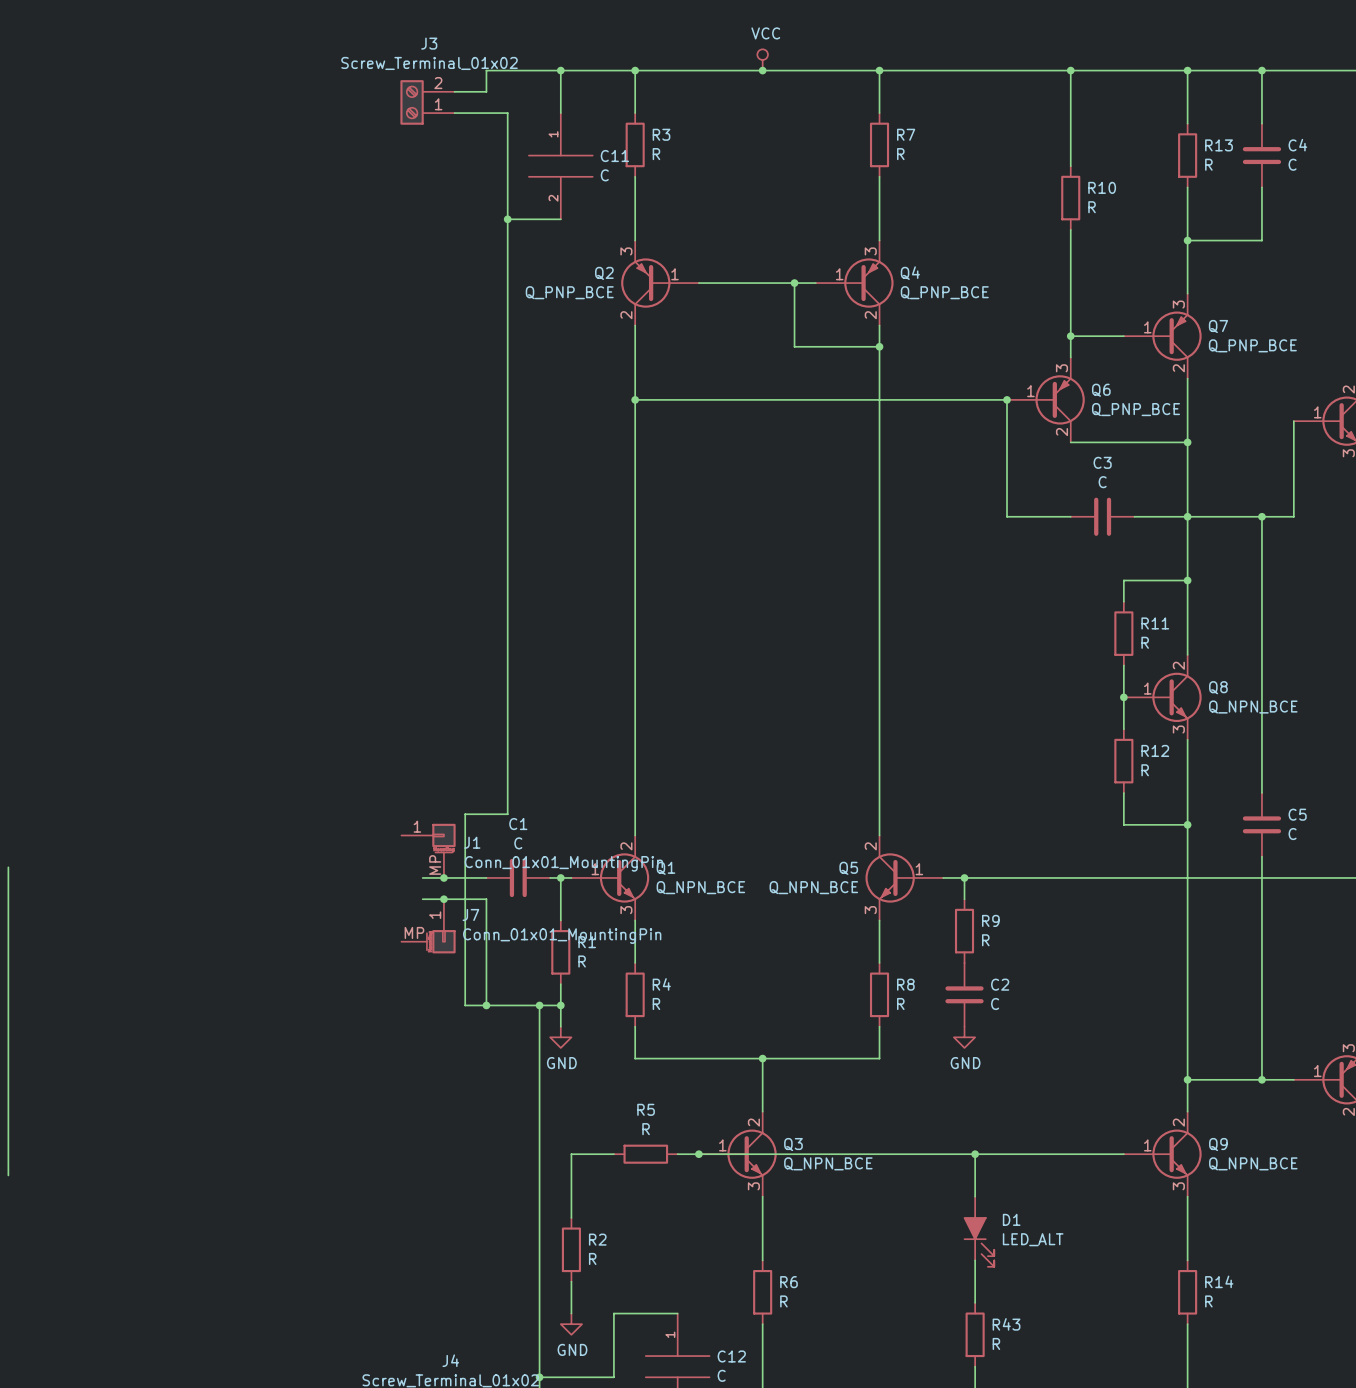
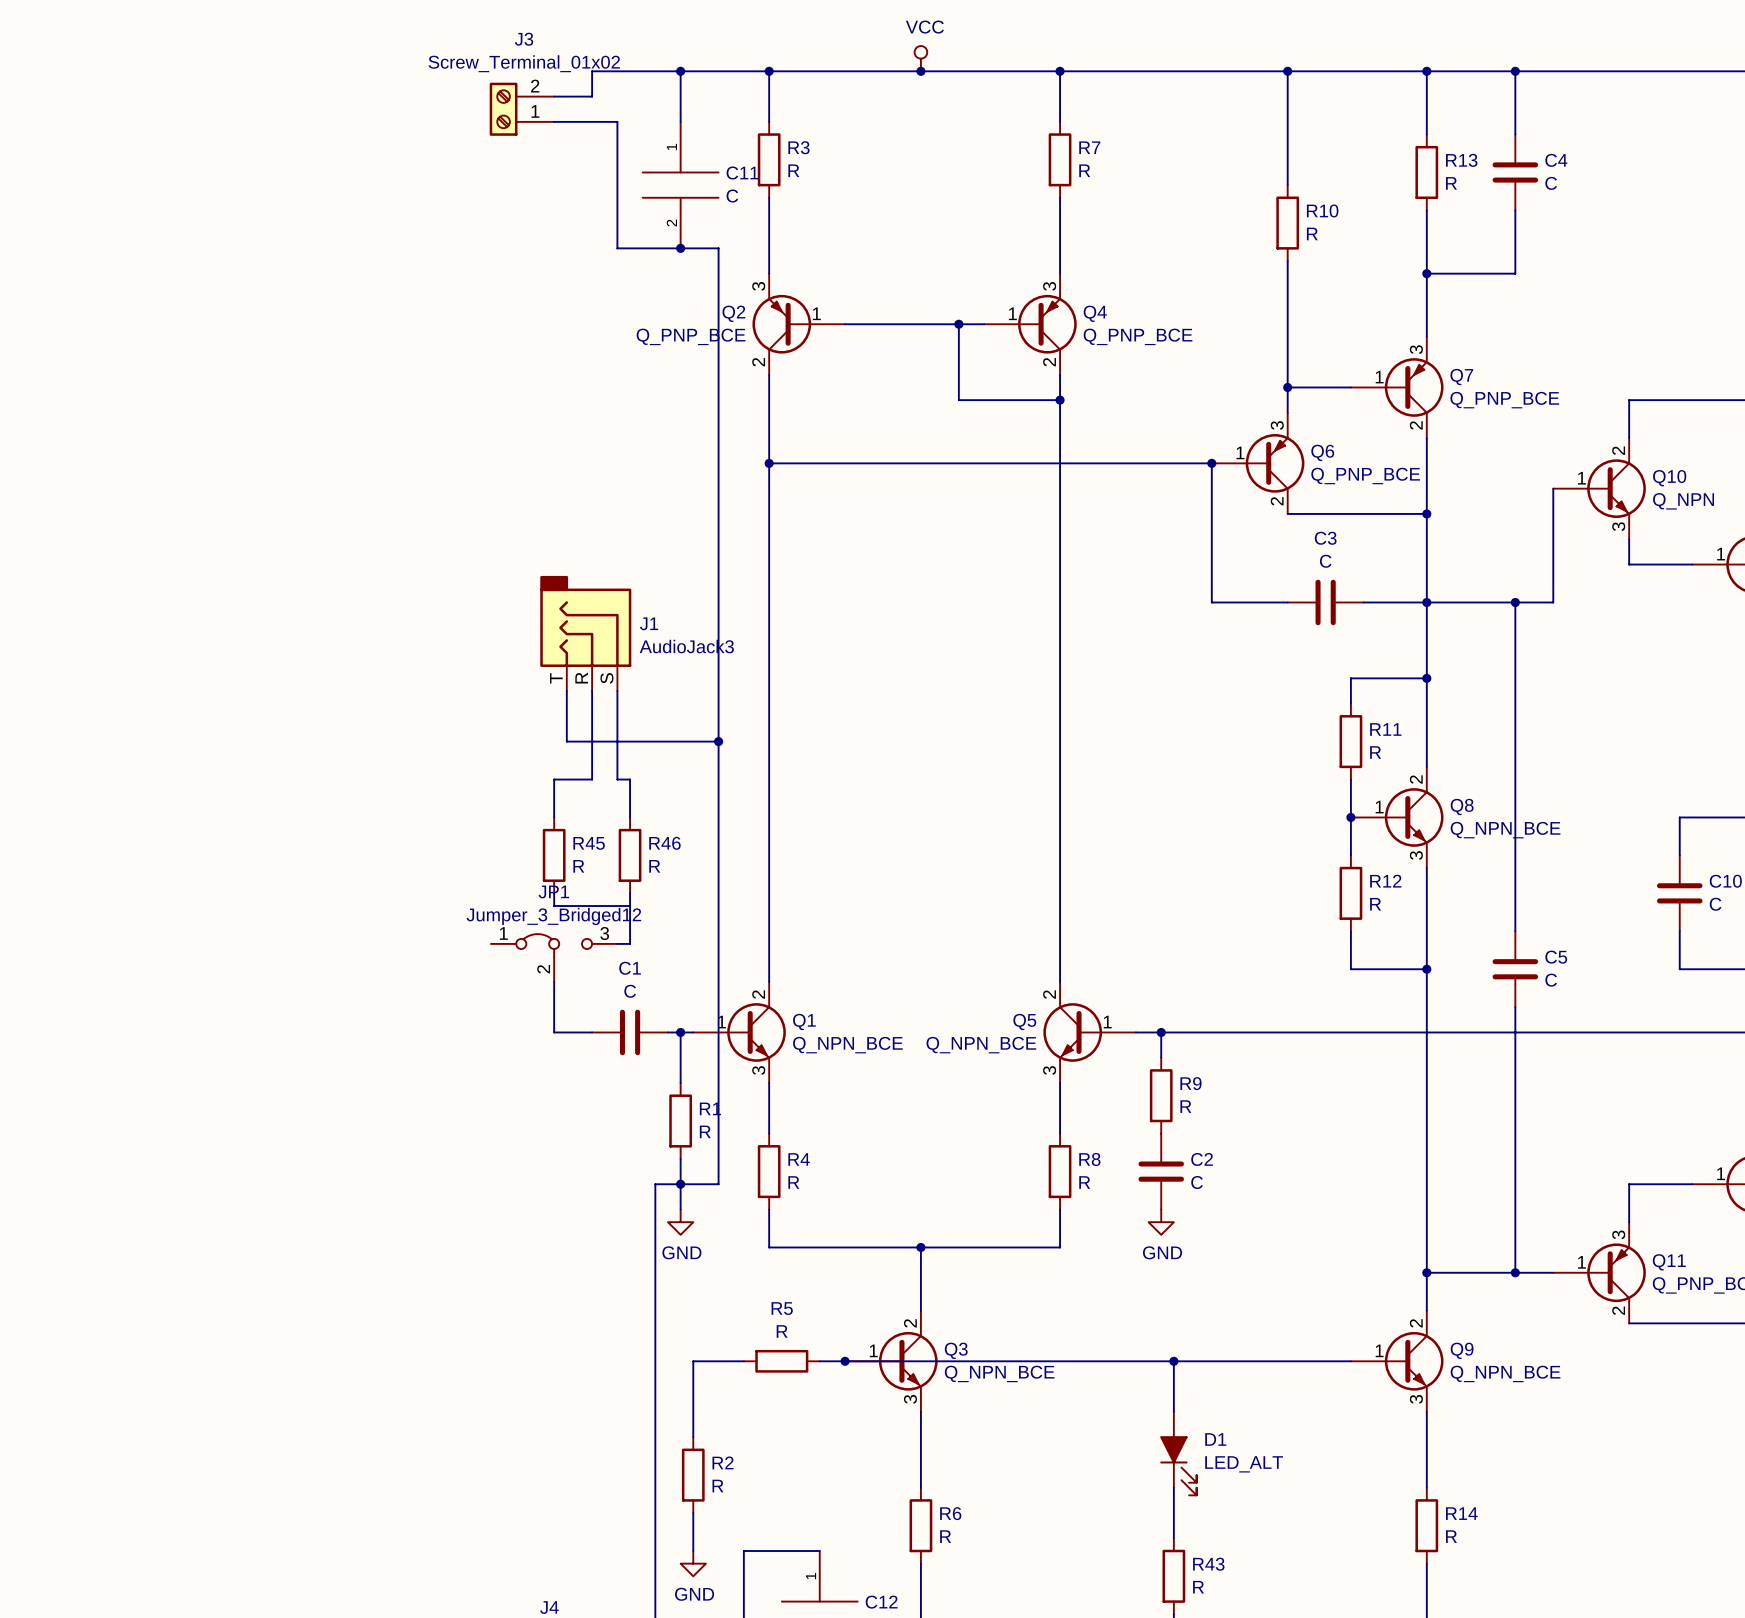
wire: (507, 219) (507, 591) -> none
junction: (507, 219) -> none
wire: none -> (680, 248) (718, 248) (718, 1184) (680, 1184)
junction: none -> (680, 248)
wire: none -> (566, 691) (566, 741) (718, 741)
wire: none -> (592, 691) (592, 779) (554, 779) (554, 817)
junction: none -> (718, 741)
wire: (507, 665) (507, 814) (465, 814) (465, 1005) (539, 1005) -> (617, 779) (630, 779) (630, 817)
R45: none -> R (554, 855)
R46: none -> R (630, 855)
wire: none -> (554, 893) (554, 906) (630, 906)
wire: none -> (630, 893) (630, 943) (617, 943)
JP1: none -> Jumper_3_Bridged12 (554, 957)
J1 symbol: [401, 823, 456, 878] -> [540, 575, 632, 692]
J1 value: Conn_01x01_MountingPin (563, 863) -> AudioJack3 (686, 646)
wire: (8, 867) (8, 1175) -> none
wire: (422, 877) (454, 877) -> (554, 981) (554, 1032)
junction: (443, 877) -> none
wire: (422, 899) (486, 899) (486, 1005) -> none
junction: (443, 899) -> none
J7: Conn_01x01_MountingPin (428, 926) -> none
junction: (486, 1005) -> none
junction: (539, 1005) -> none

